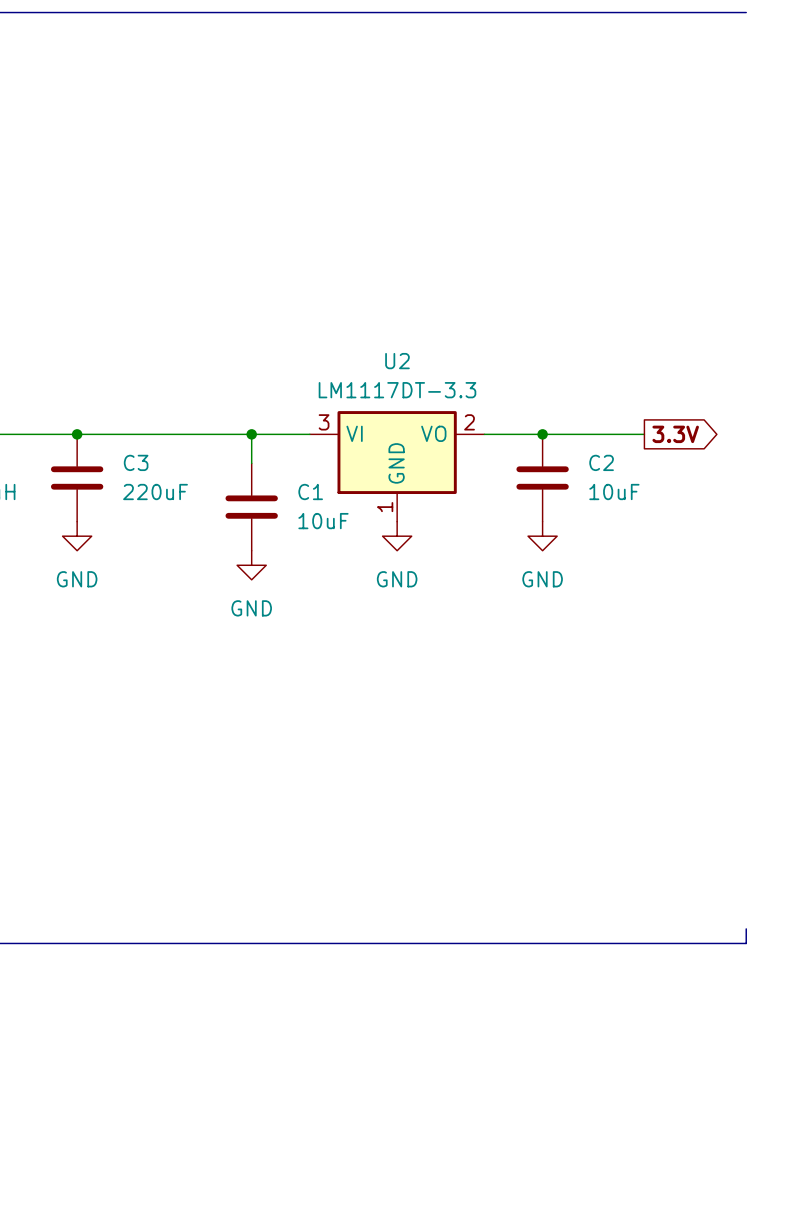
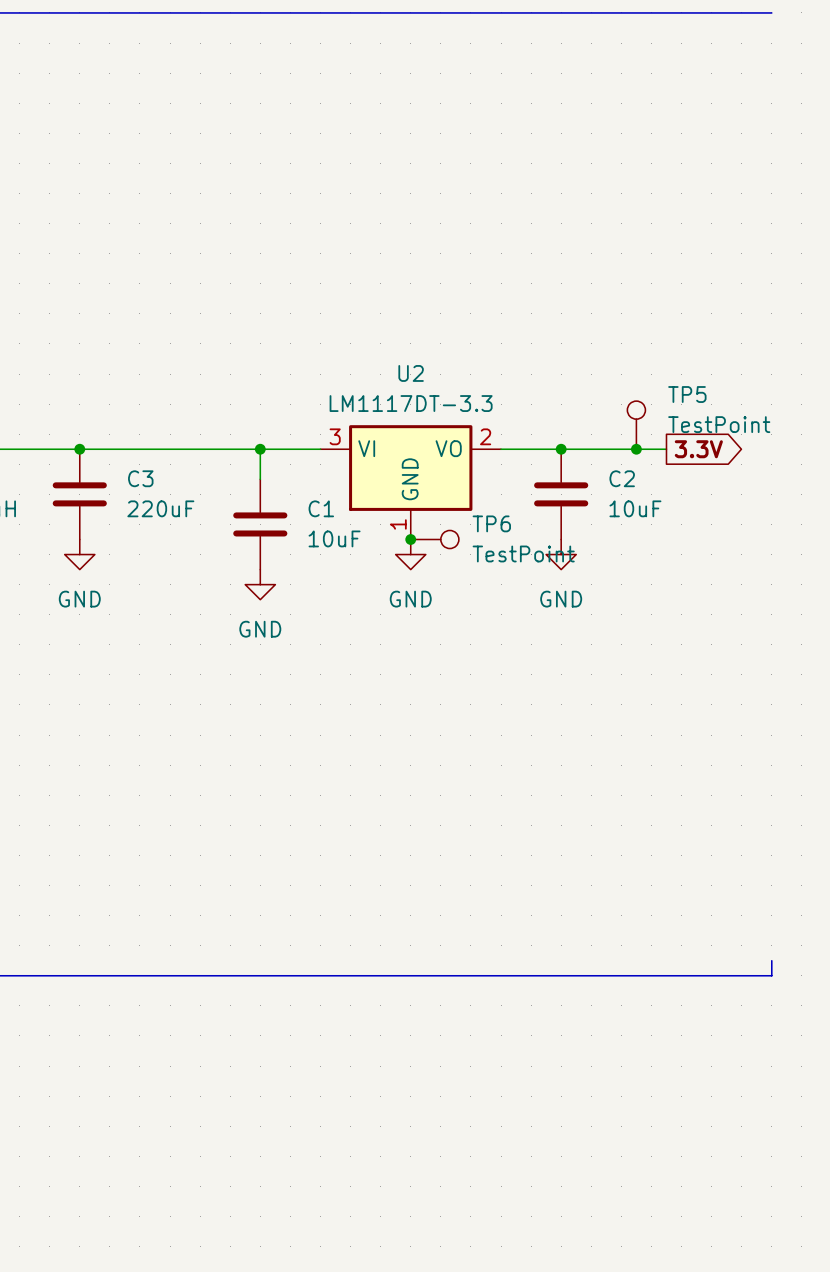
TP5: none -> TestPoint (636, 425)
junction: none -> (636, 449)
junction: none -> (410, 539)
TP6: none -> TestPoint (434, 539)

